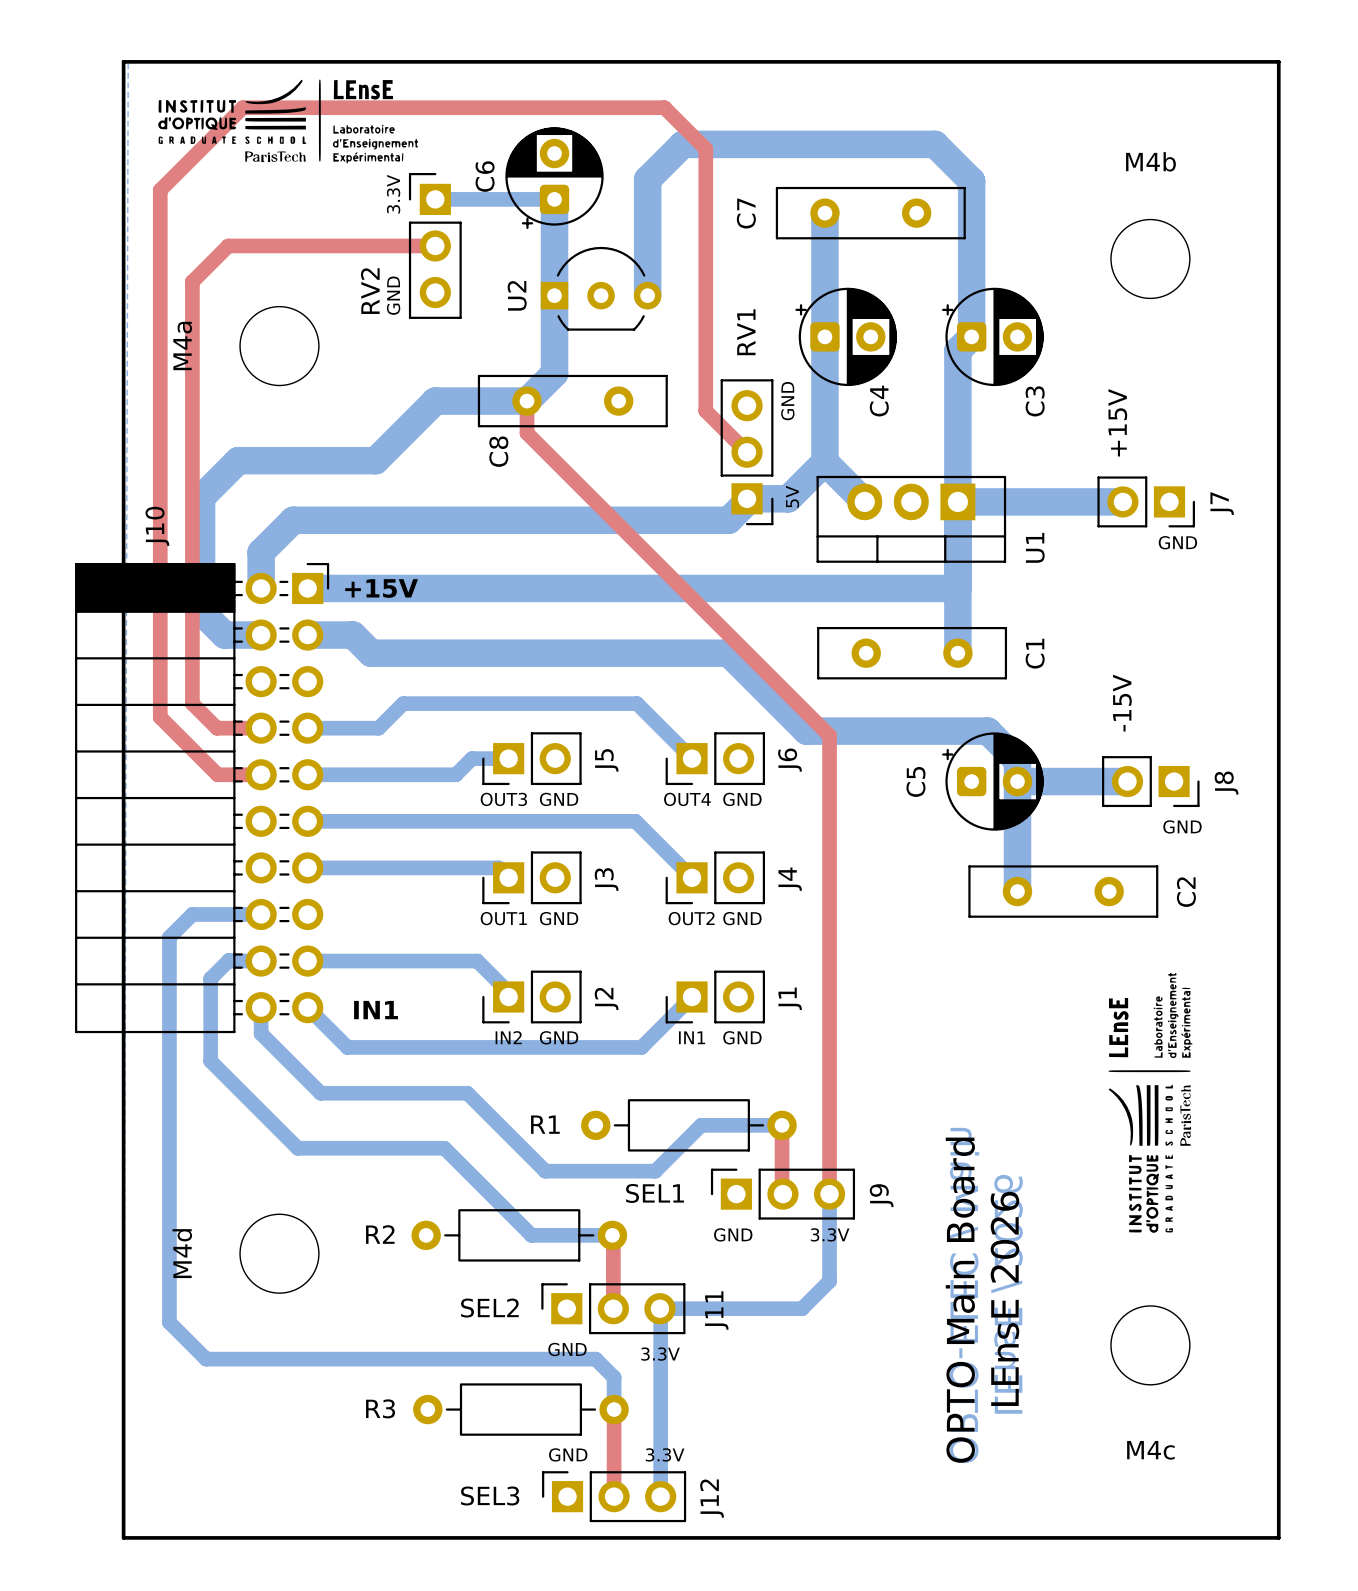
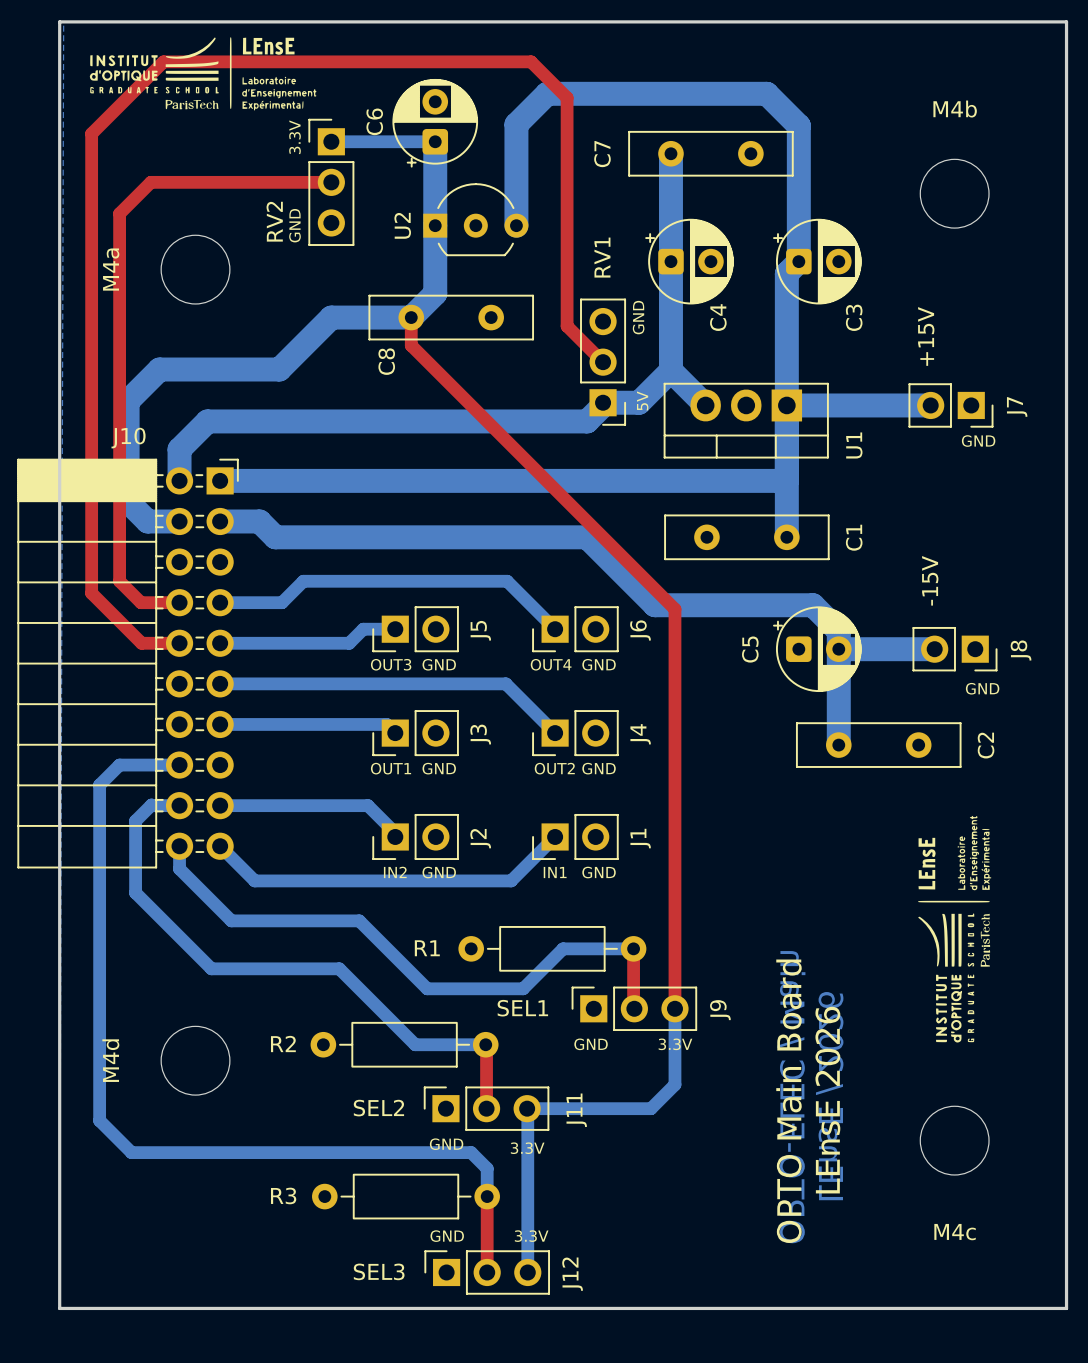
J10 name rotation: 0° (157, 526) -> 90° clockwise (128, 438)
text: +15V (381, 588) -> none
text: IN1 (376, 1010) -> none

